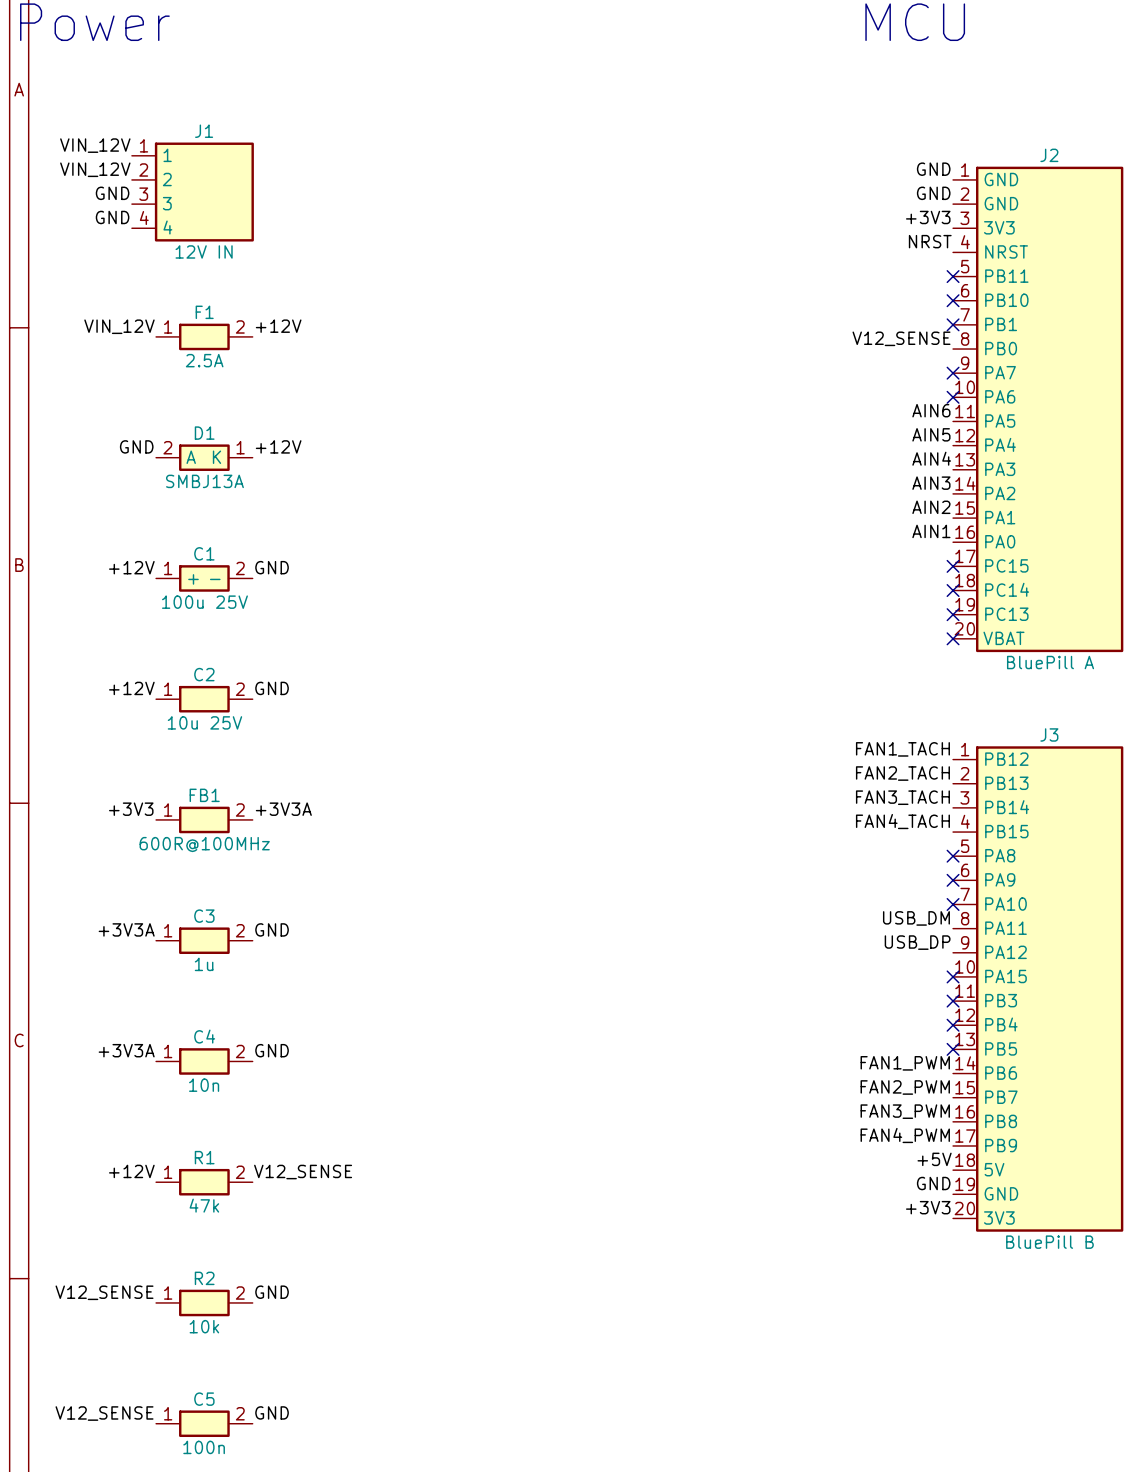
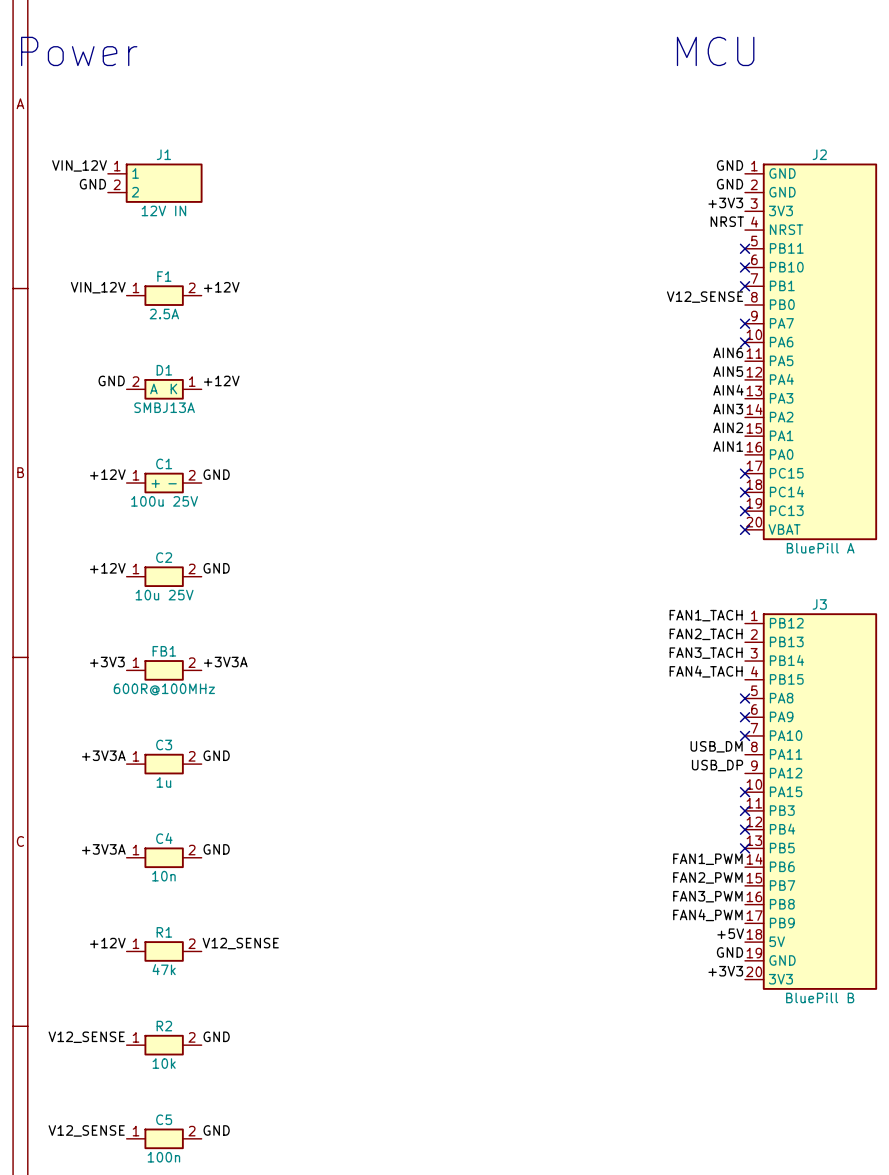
J1 name position: J1 (204, 131) -> J1 (163, 154)
J1 symbol: [131, 142, 254, 242] -> [107, 163, 203, 203]
label: VIN_12V (95, 145) -> none
label: GND (112, 217) -> none
J1 value position: 12V IN (204, 251) -> 12V IN (163, 210)

